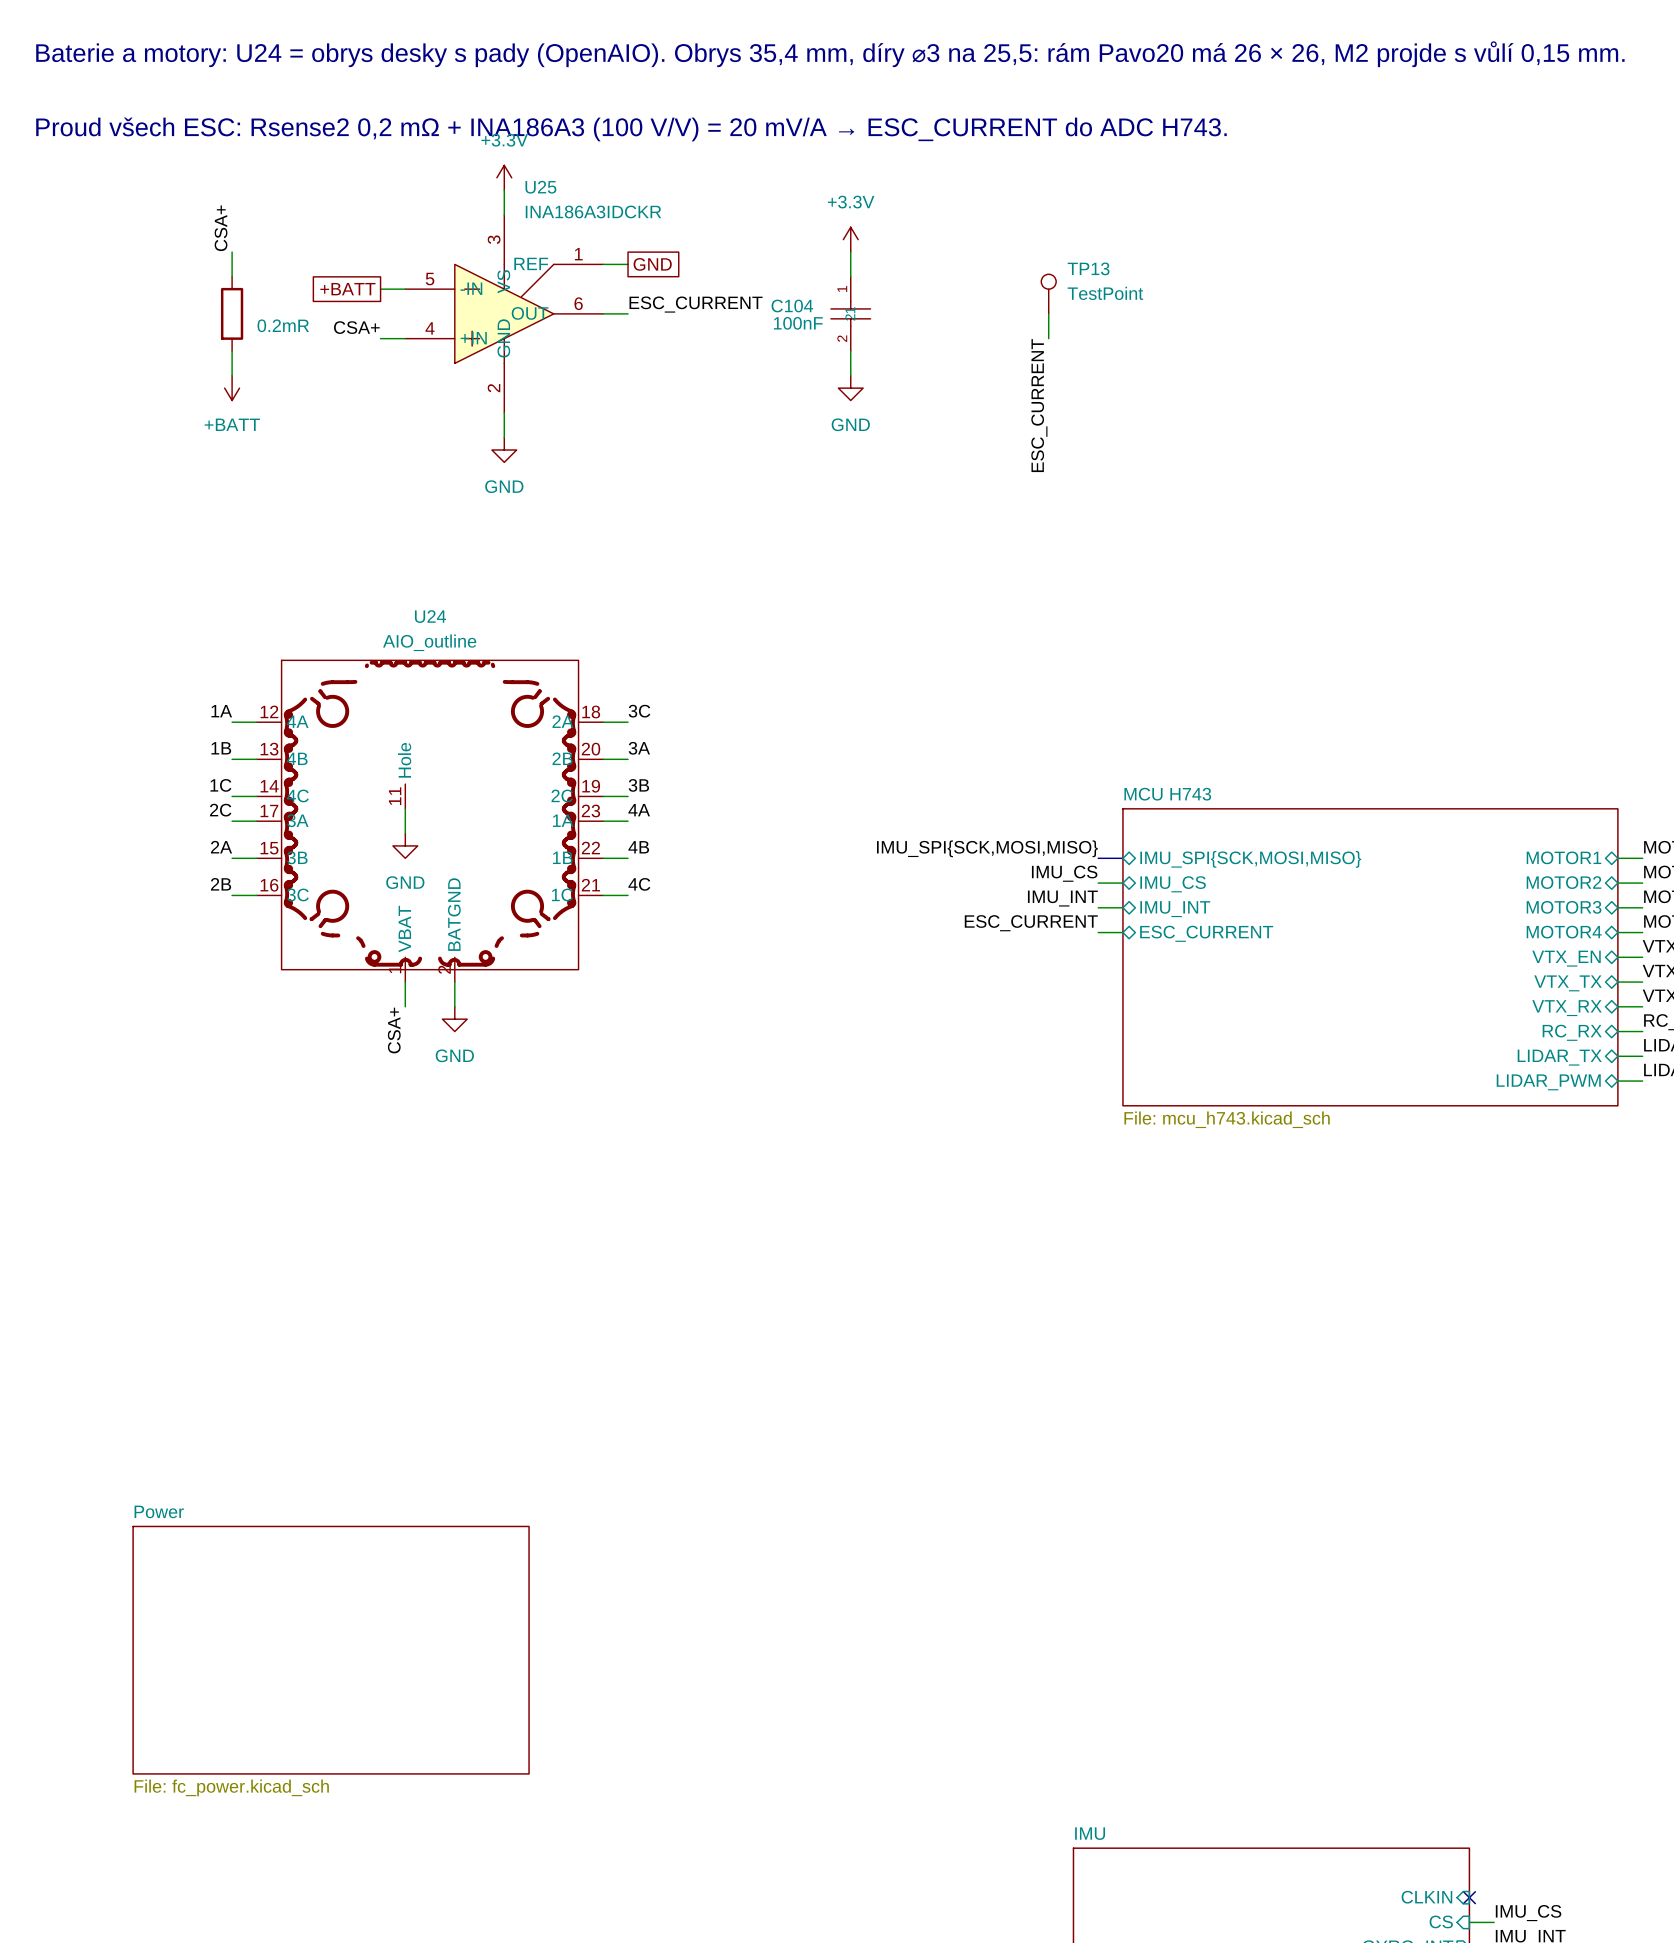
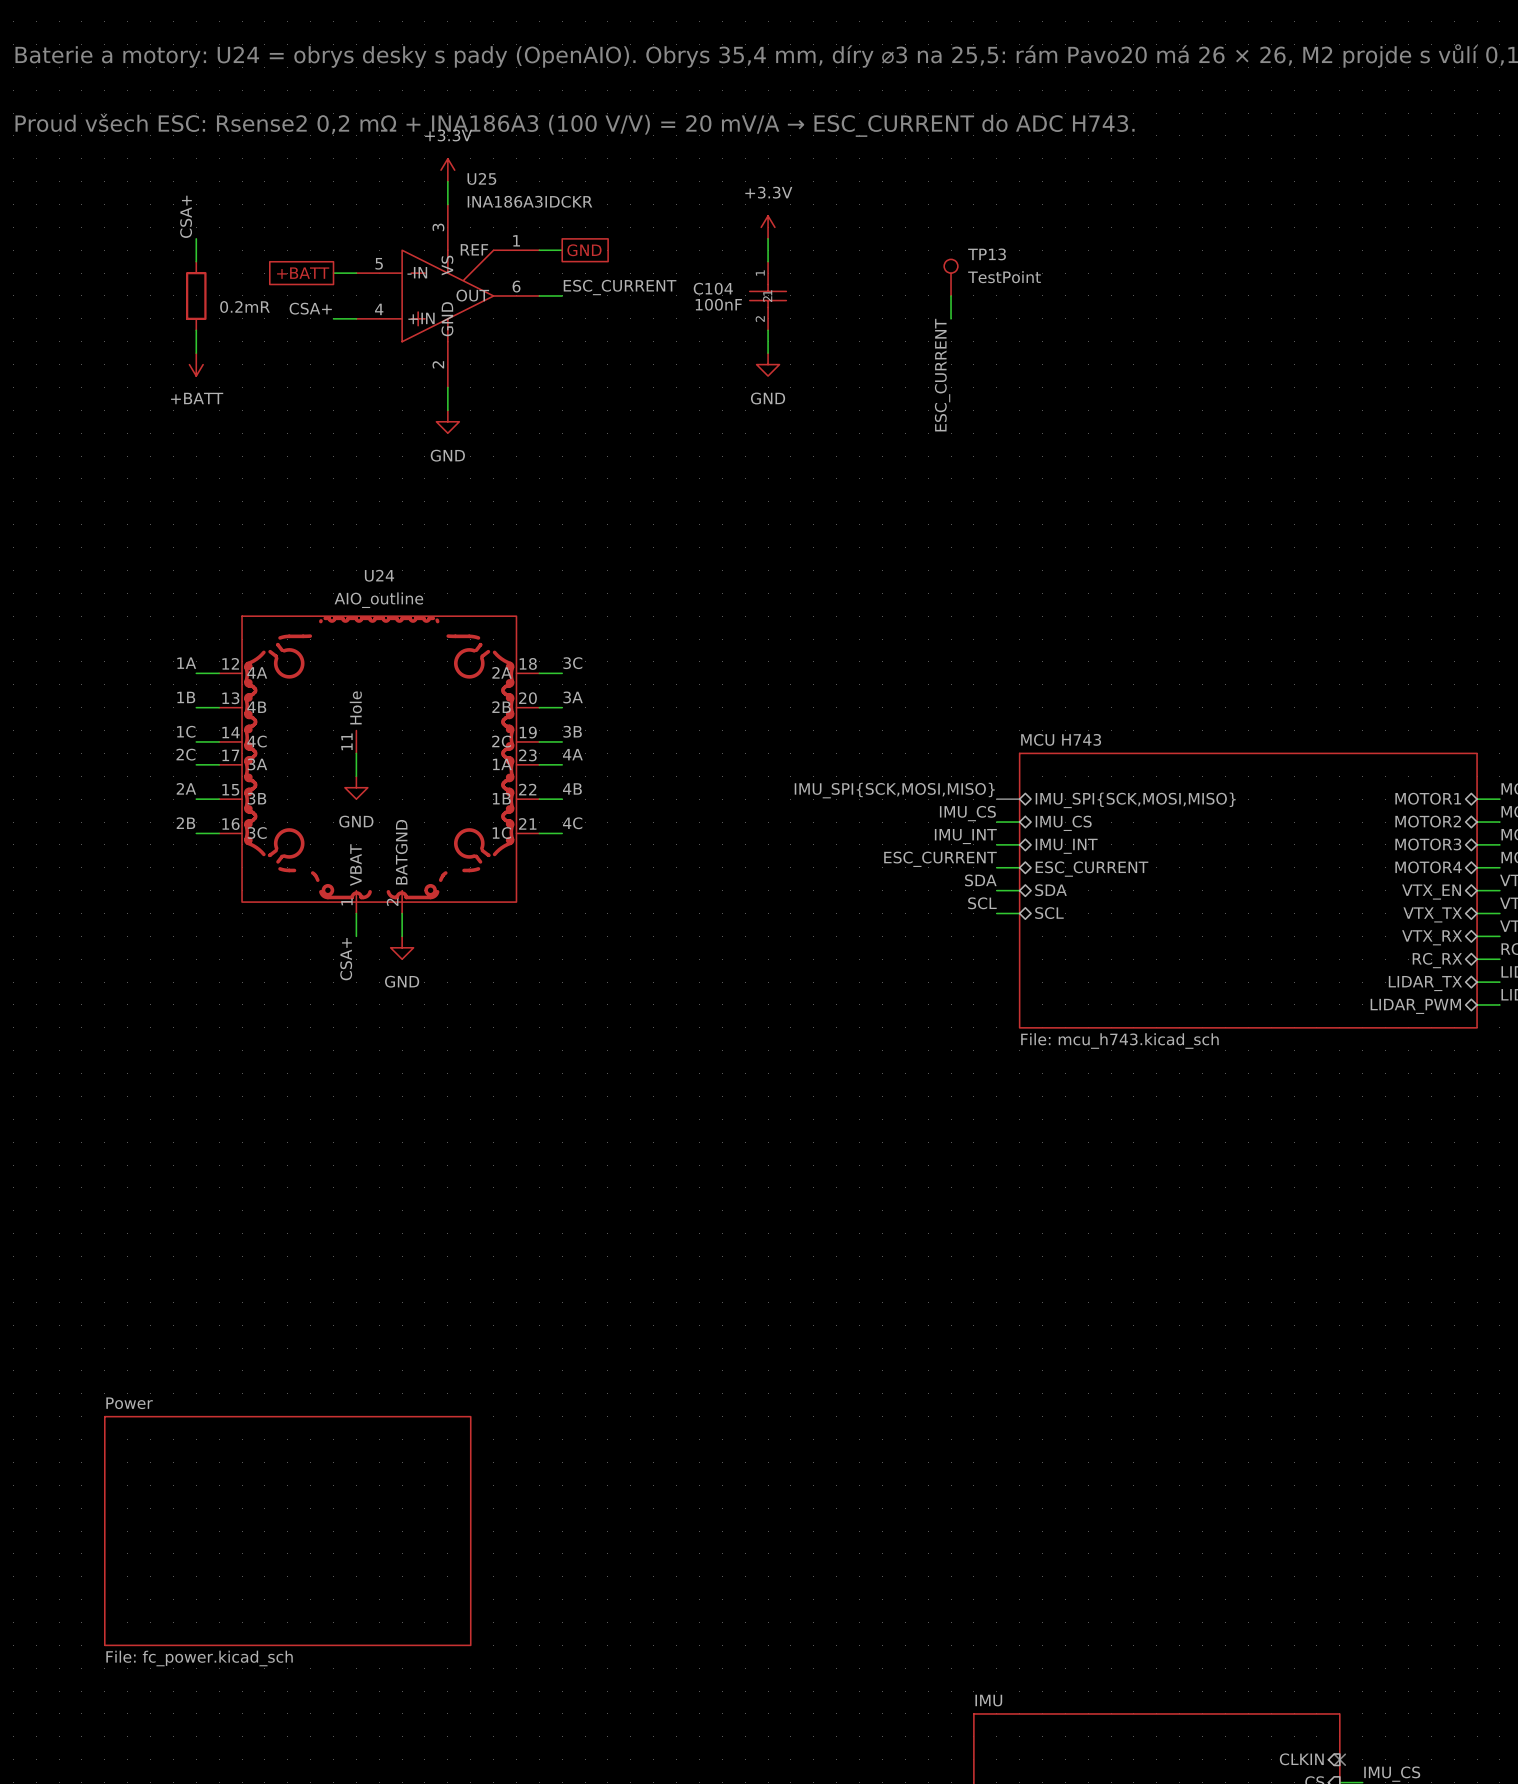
label: none -> SDA (980, 880)
sheet pin: none -> SDA (1050, 890)
wire: none -> (996, 890) (1019, 890)
label: none -> SCL (982, 903)
sheet pin: none -> SCL (1049, 913)
wire: none -> (996, 913) (1019, 913)

